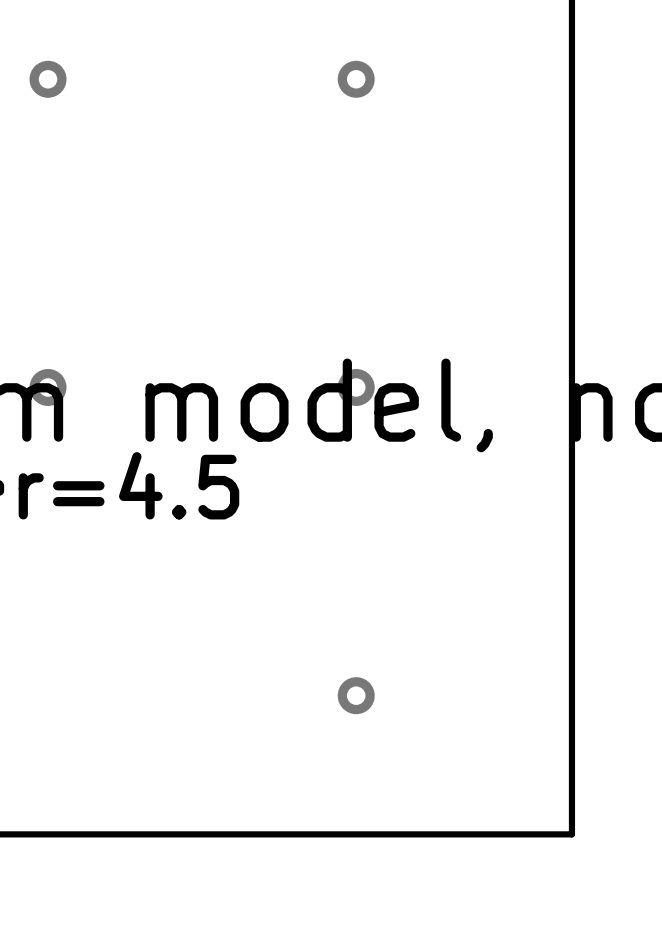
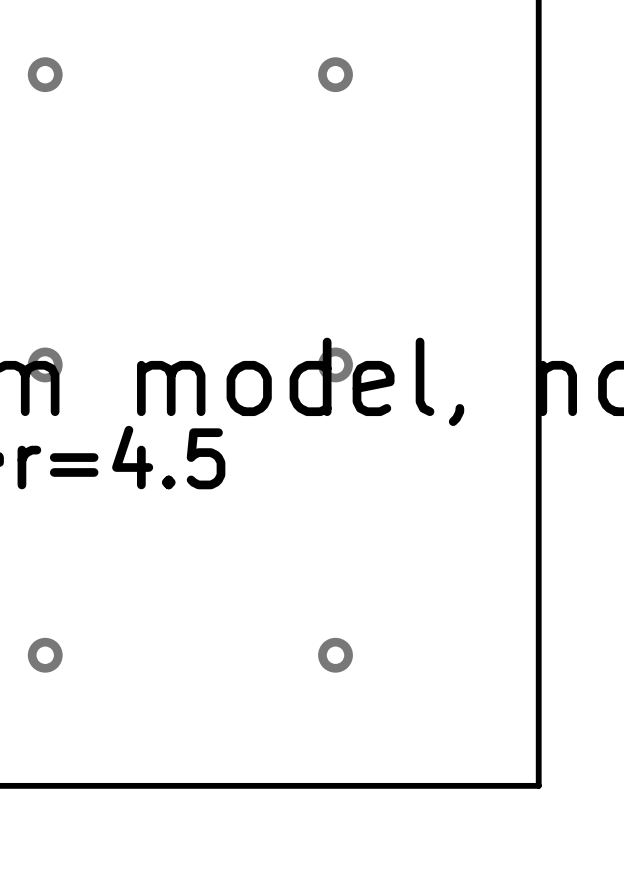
via: none -> (45, 655)

